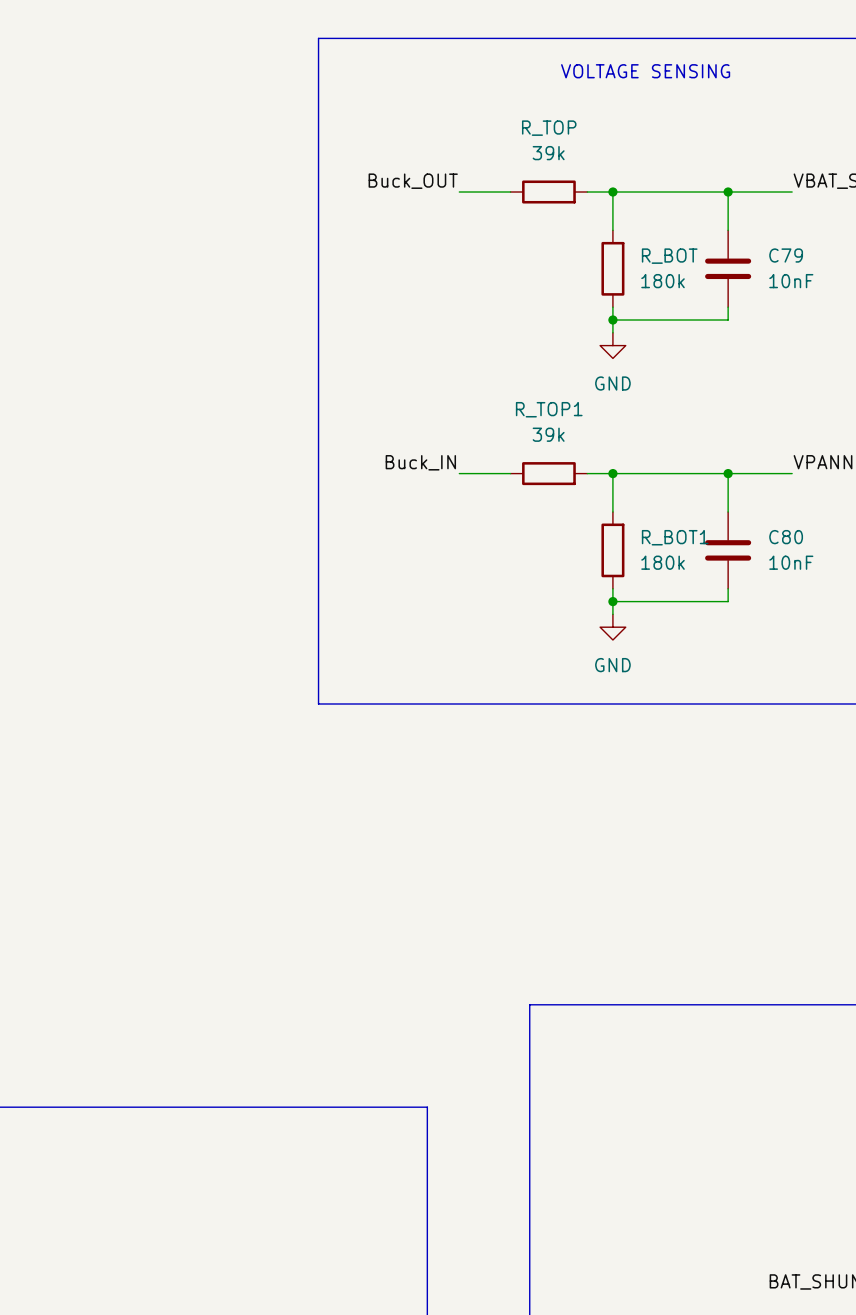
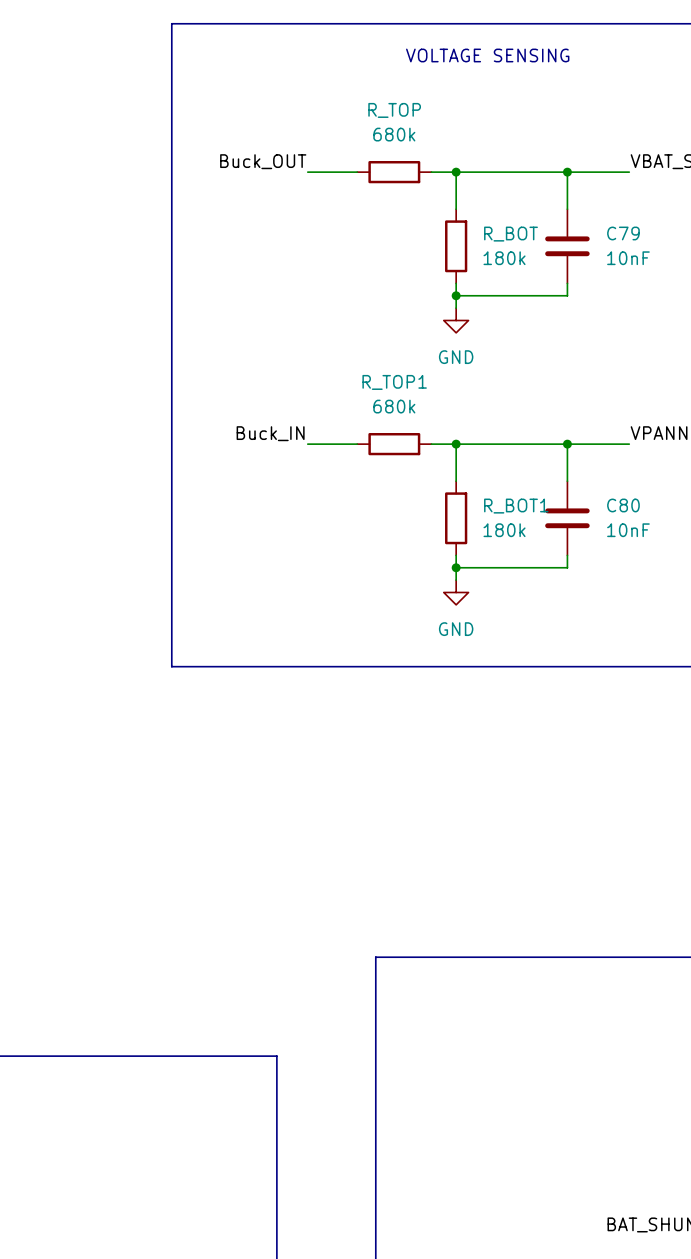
R_TOP value: 39k (548, 153) -> 680k (394, 134)
R_TOP1 value: 39k (548, 434) -> 680k (394, 406)

